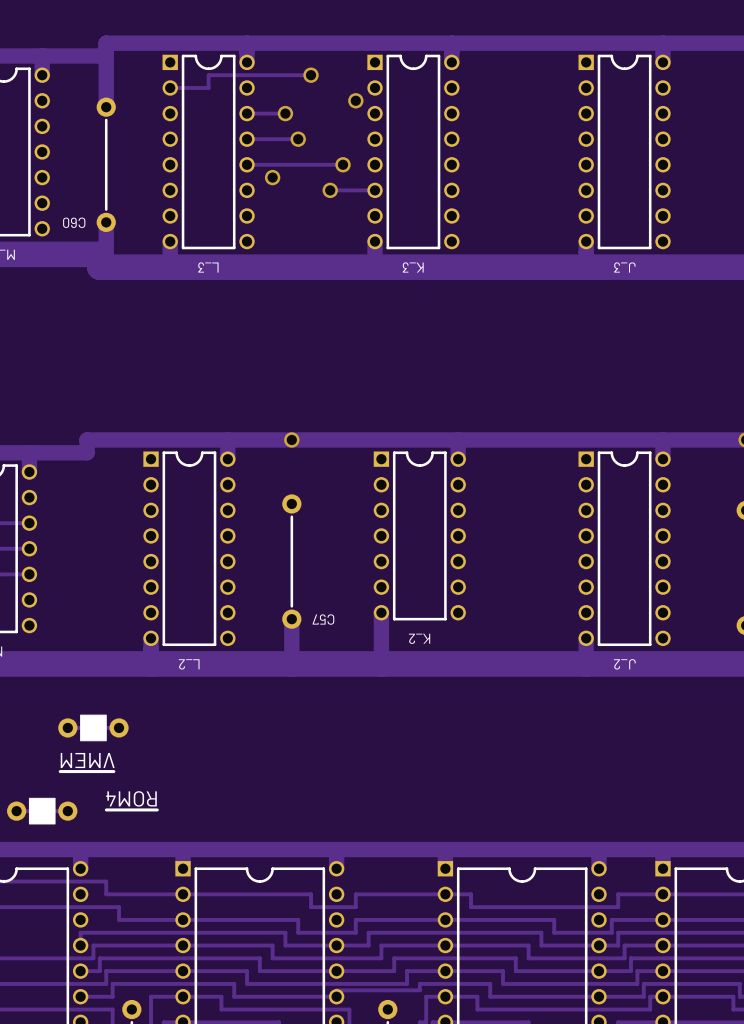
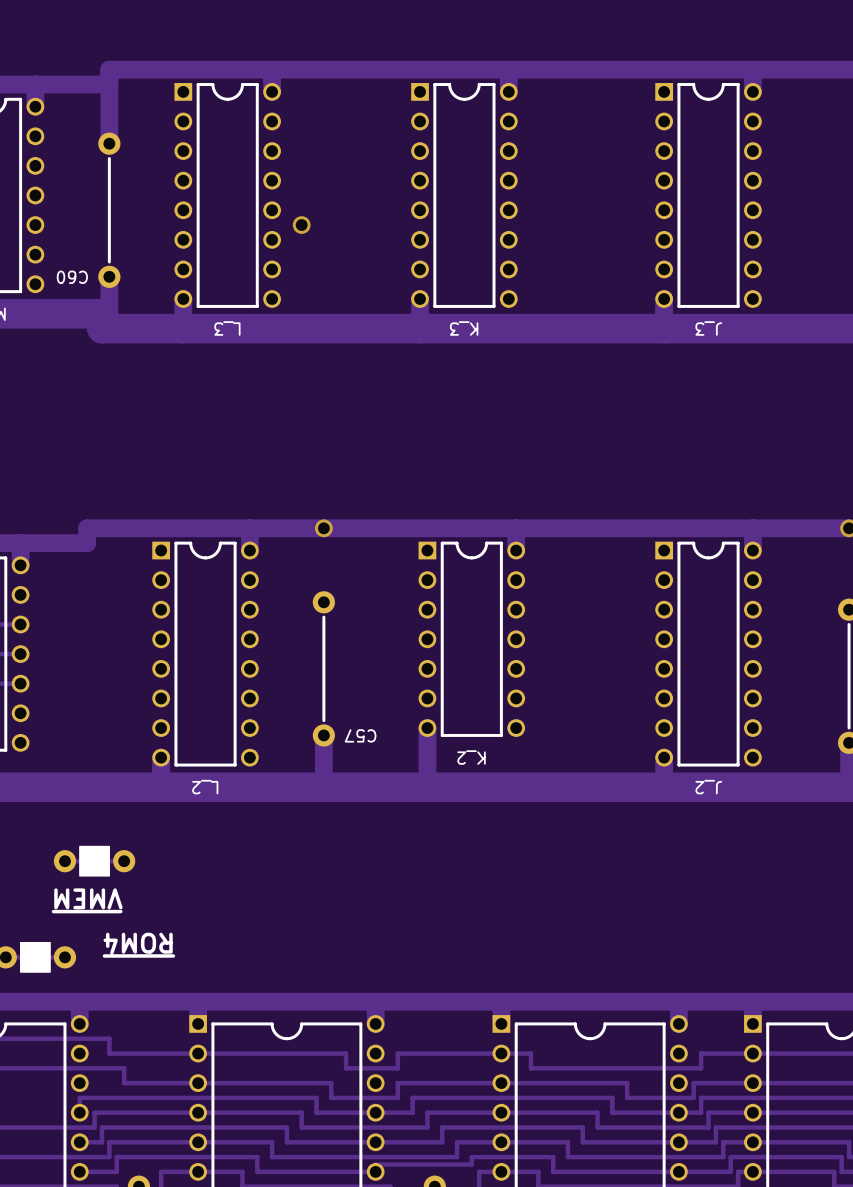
track: (311, 75) (208, 75) (208, 87) (170, 87) -> none
via: (311, 75) -> none
via: (355, 100) -> none
track: (247, 113) (285, 113) -> none
via: (285, 113) -> none
track: (247, 139) (298, 139) -> none
via: (298, 139) -> none
track: (247, 164) (343, 164) -> none
via: (343, 164) -> none
track: (330, 190) (375, 190) -> none
via: (330, 190) -> none

